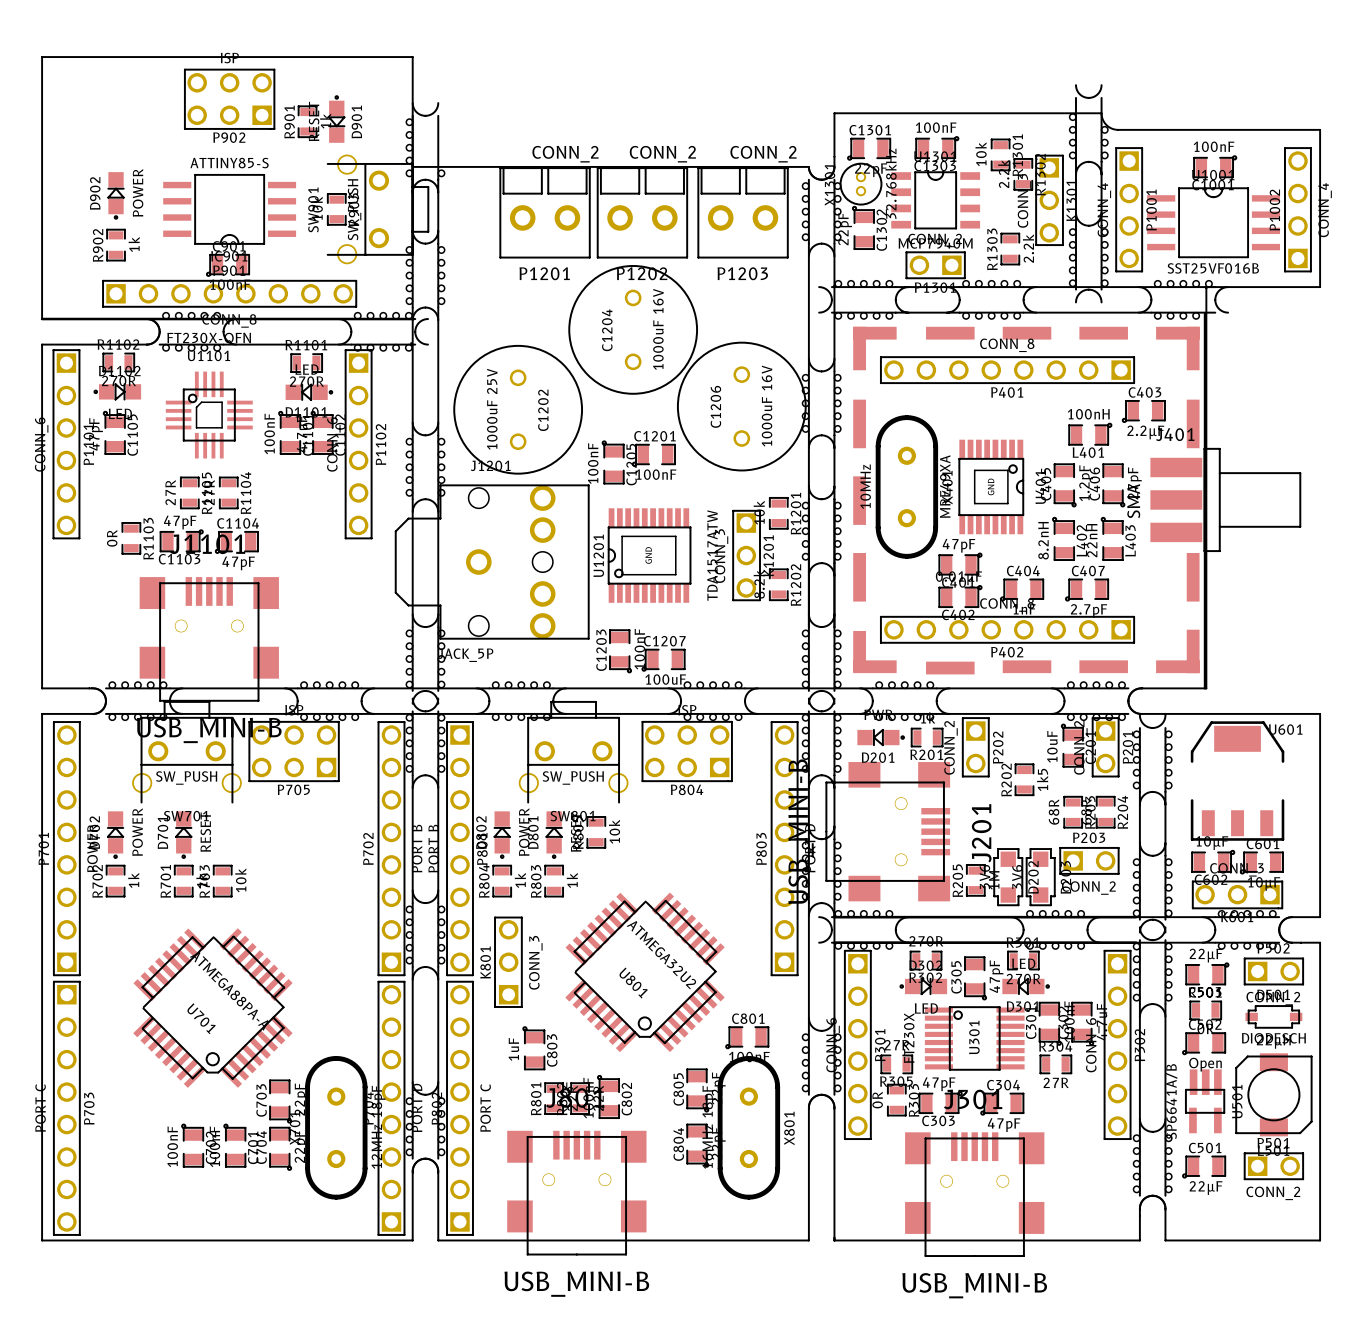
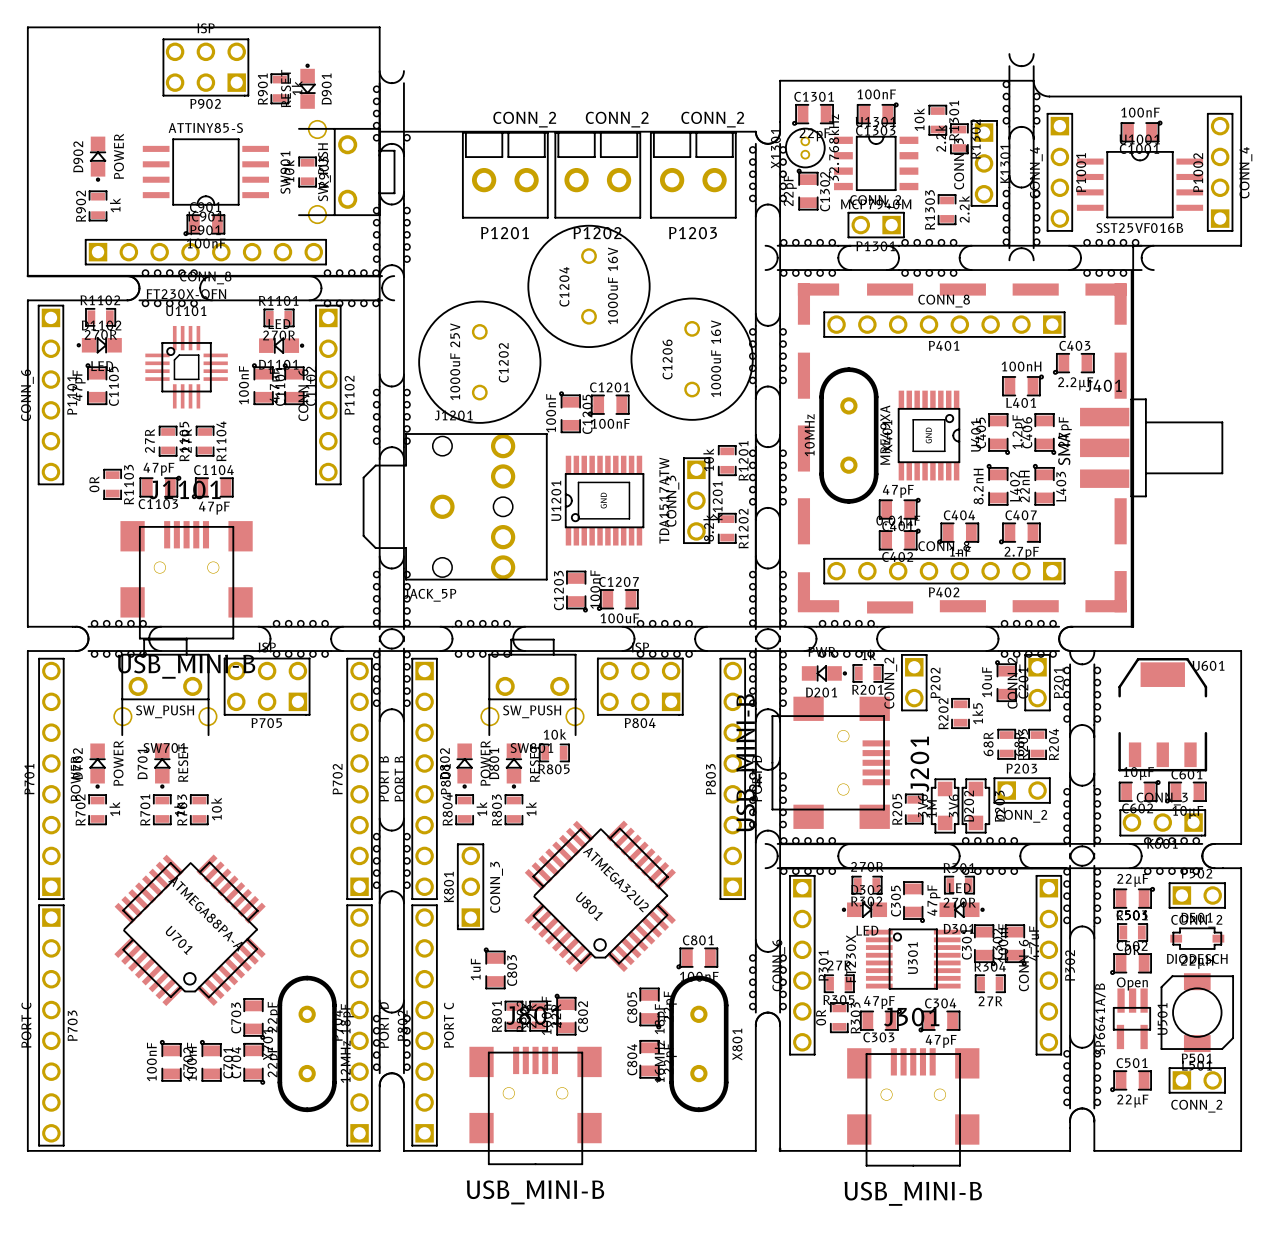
R805 value position: 10k (614, 831) -> 10k (555, 734)
R805 rotation: 0° (596, 832) -> 90° clockwise (554, 752)

